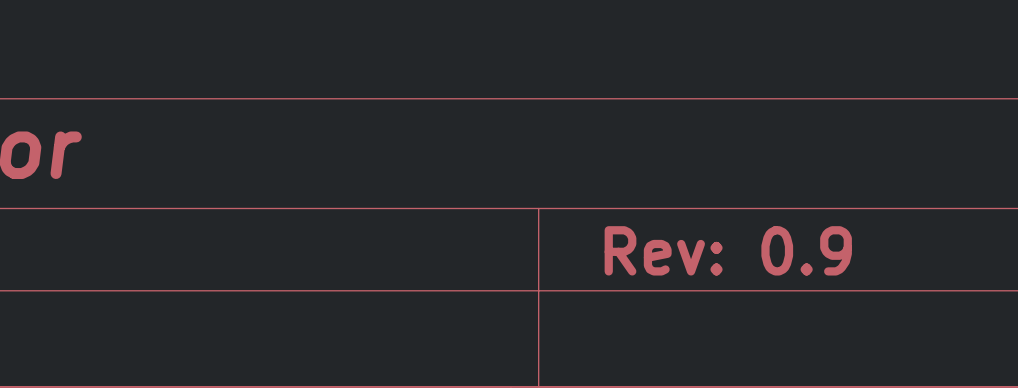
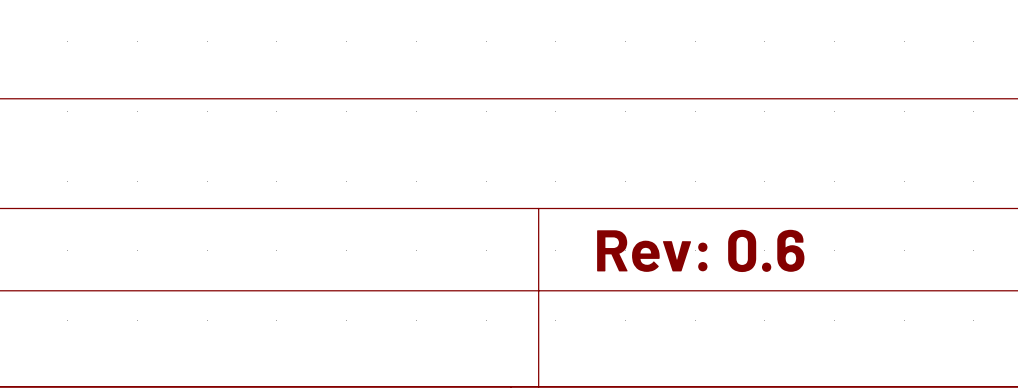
title block: Rev: 0.9 (728, 250) -> Rev: 0.6 (700, 250)

